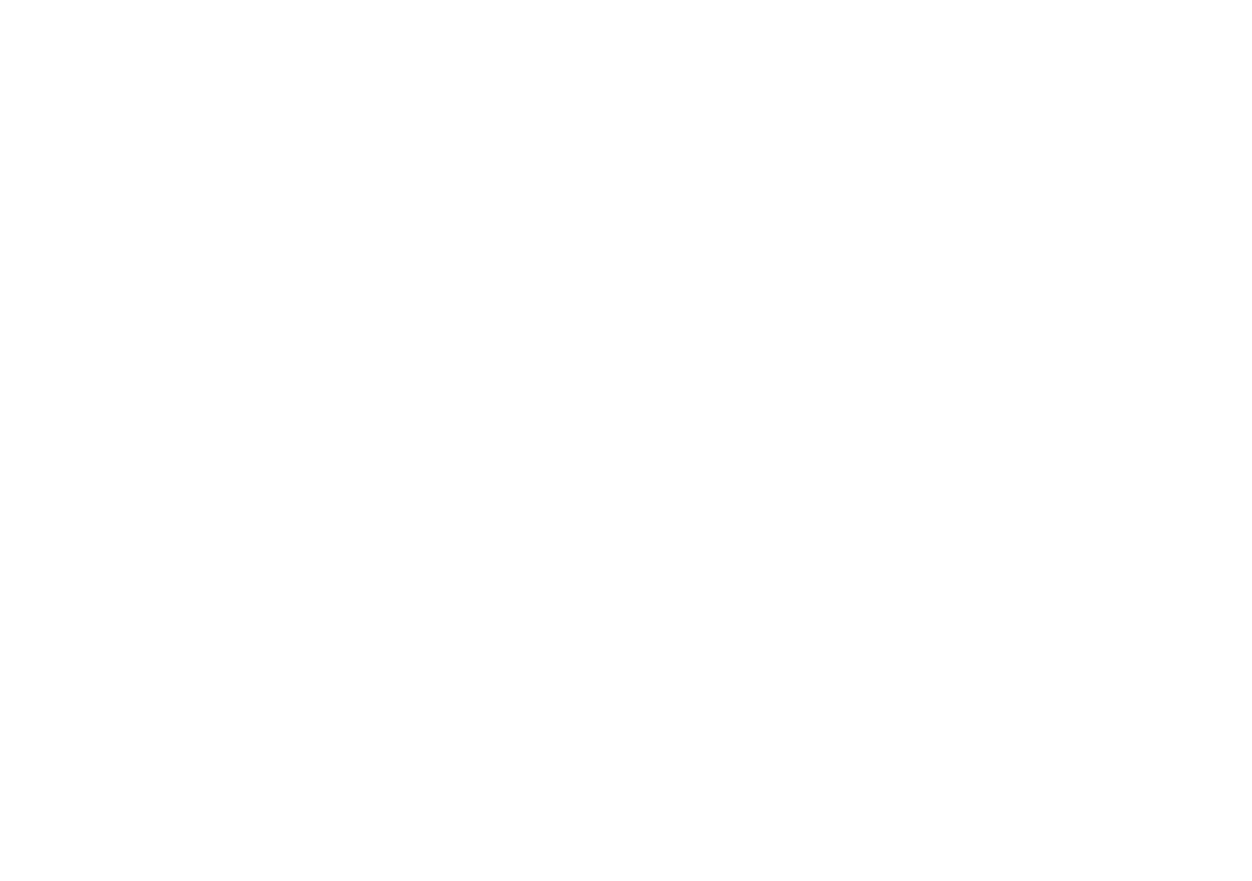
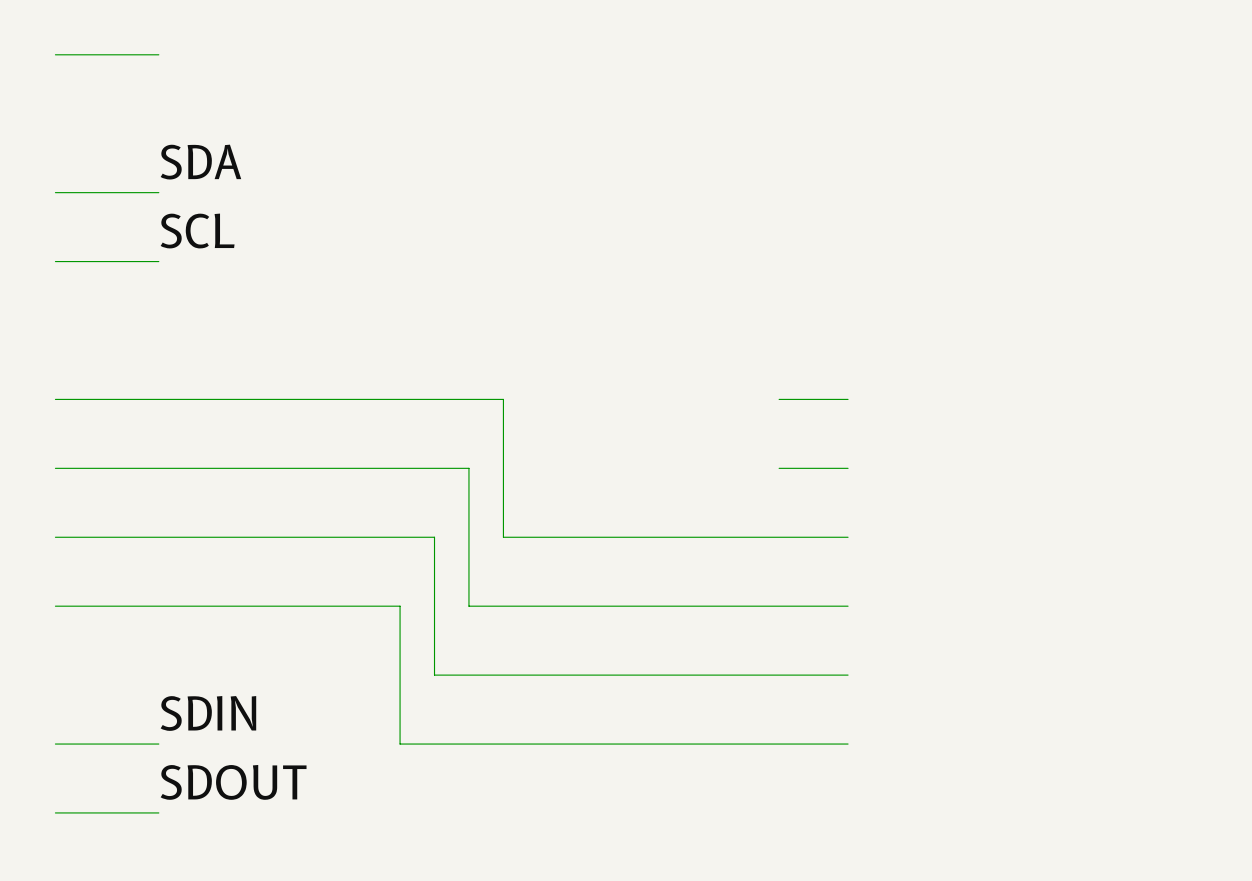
wire: none -> (55, 54) (158, 54)
label: none -> SDA (200, 162)
wire: none -> (55, 192) (158, 192)
label: none -> SCL (197, 231)
wire: none -> (55, 261) (158, 261)
wire: none -> (55, 399) (503, 399) (503, 537) (848, 537)
wire: none -> (779, 399) (848, 399)
wire: none -> (55, 468) (468, 468) (468, 606) (848, 606)
wire: none -> (779, 468) (848, 468)
wire: none -> (55, 537) (434, 537) (434, 675) (848, 675)
wire: none -> (55, 606) (400, 606) (400, 744) (848, 744)
label: none -> SDIN (208, 713)
wire: none -> (55, 744) (158, 744)
label: none -> SDOUT (233, 782)
wire: none -> (55, 812) (158, 812)

